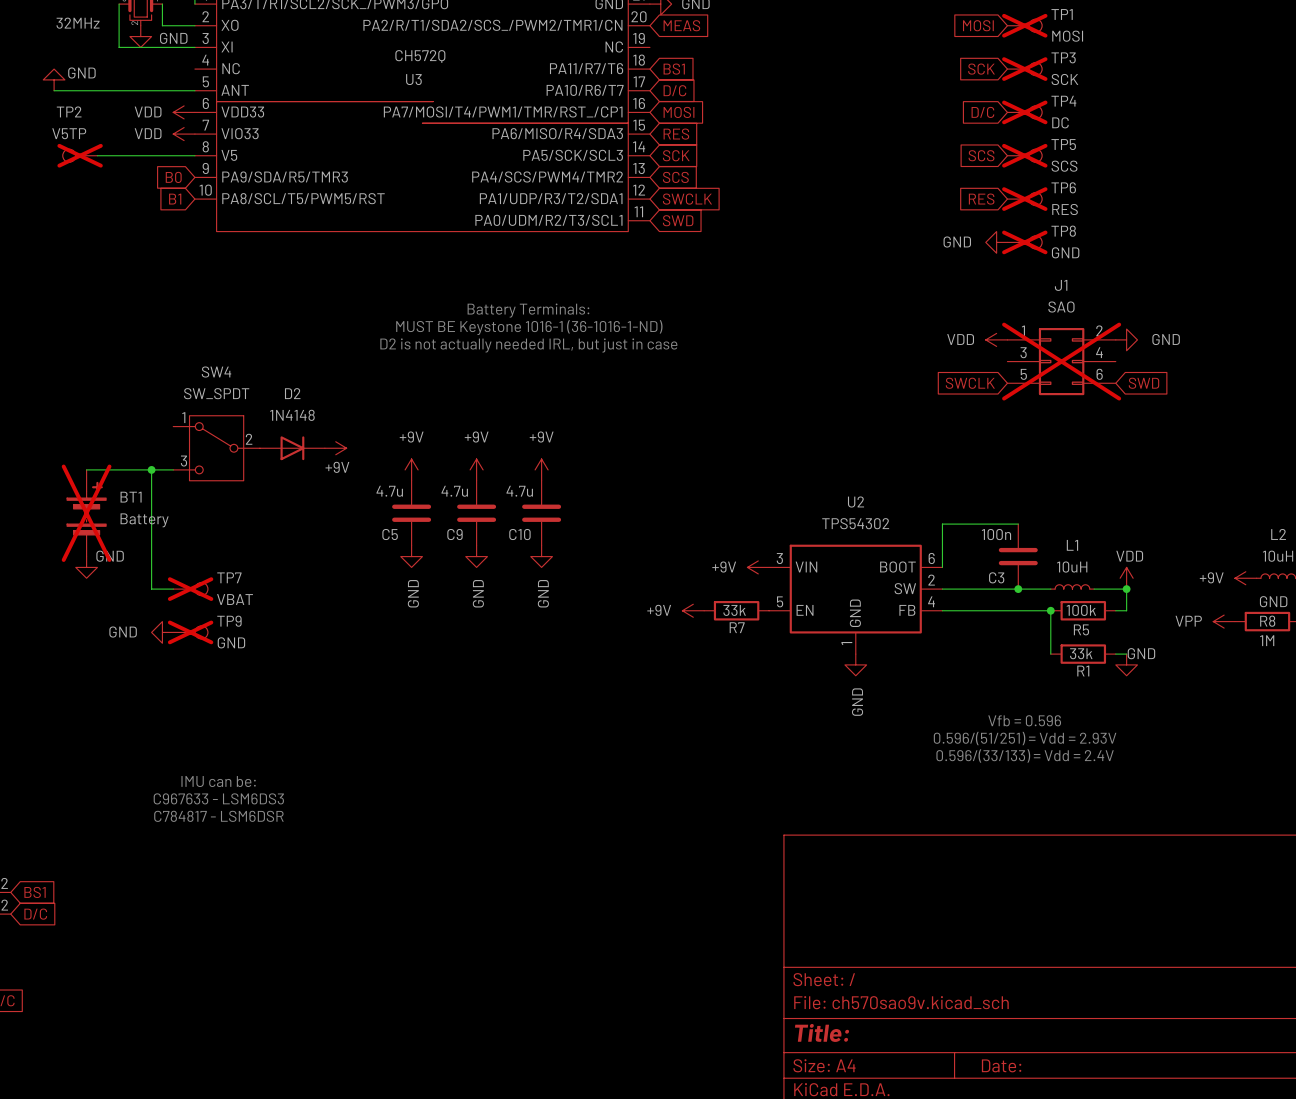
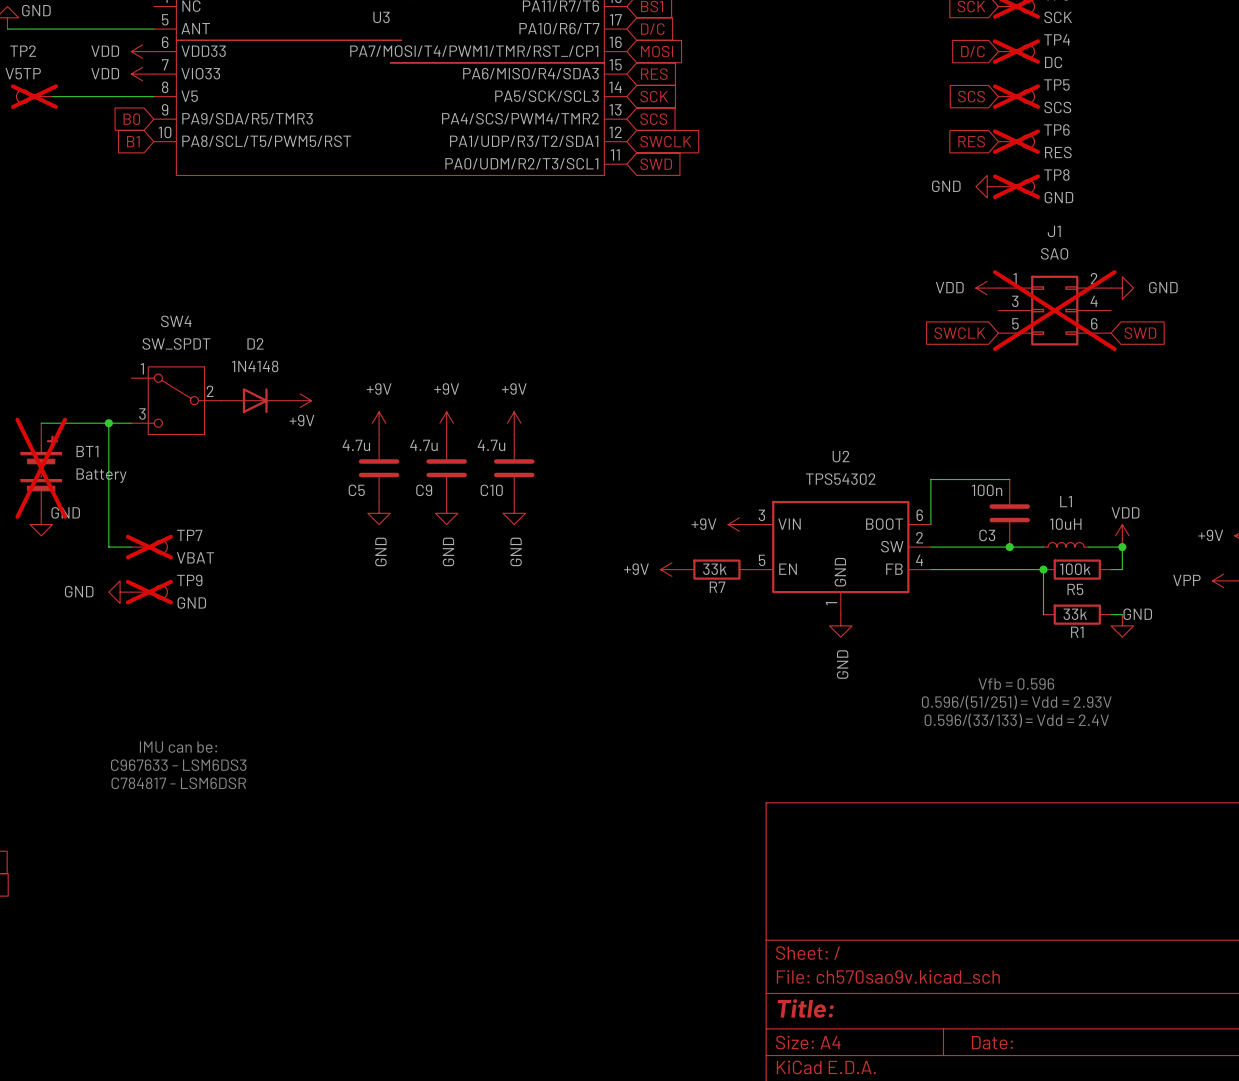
text: Battery Terminals: (528, 310) -> none
text: MUST BE Keystone 1016-1 (36-1016-1-ND) (529, 327) -> none
text: D2 is not actually needed IRL, but just in case (528, 345) -> none

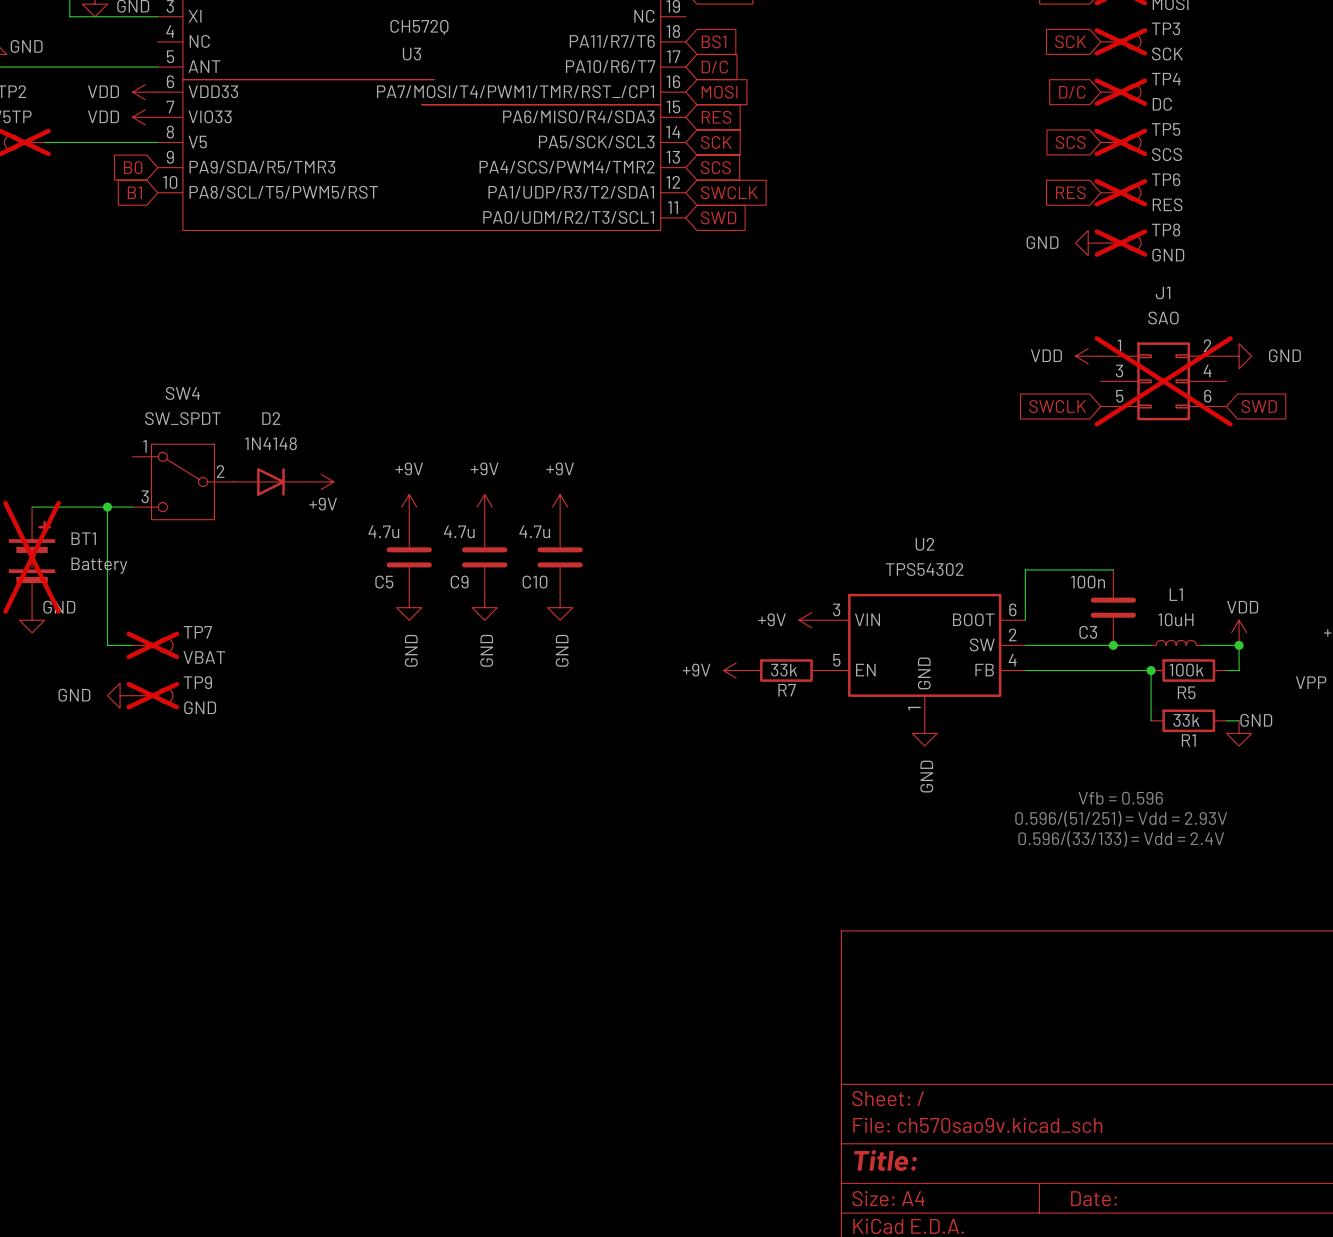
text: IMU can be: (178, 747) -> none
text: C967633 - LSM6DS3 (178, 765) -> none
text: C784817 - LSM6DSR (178, 783) -> none

